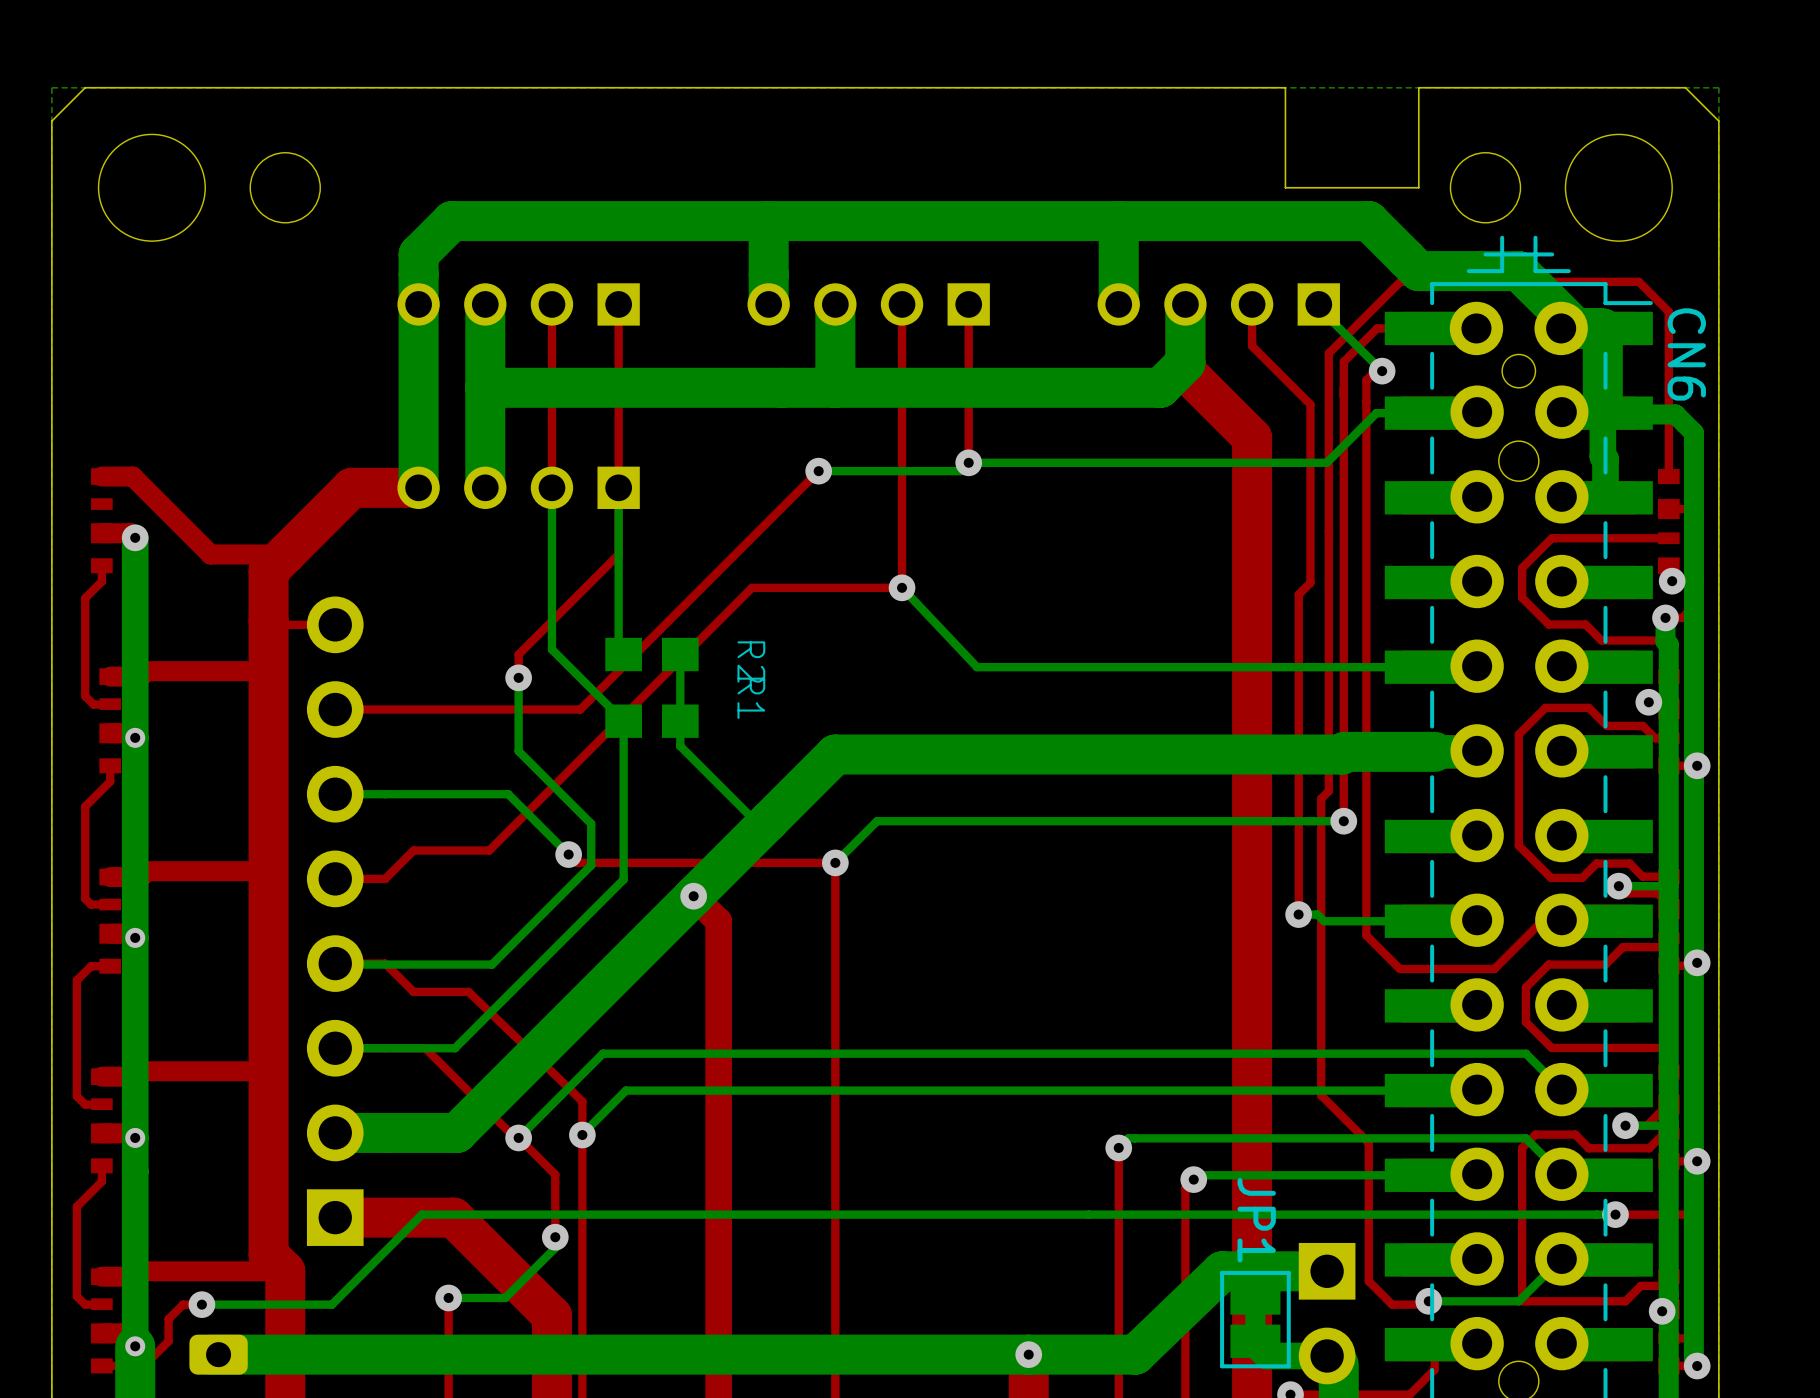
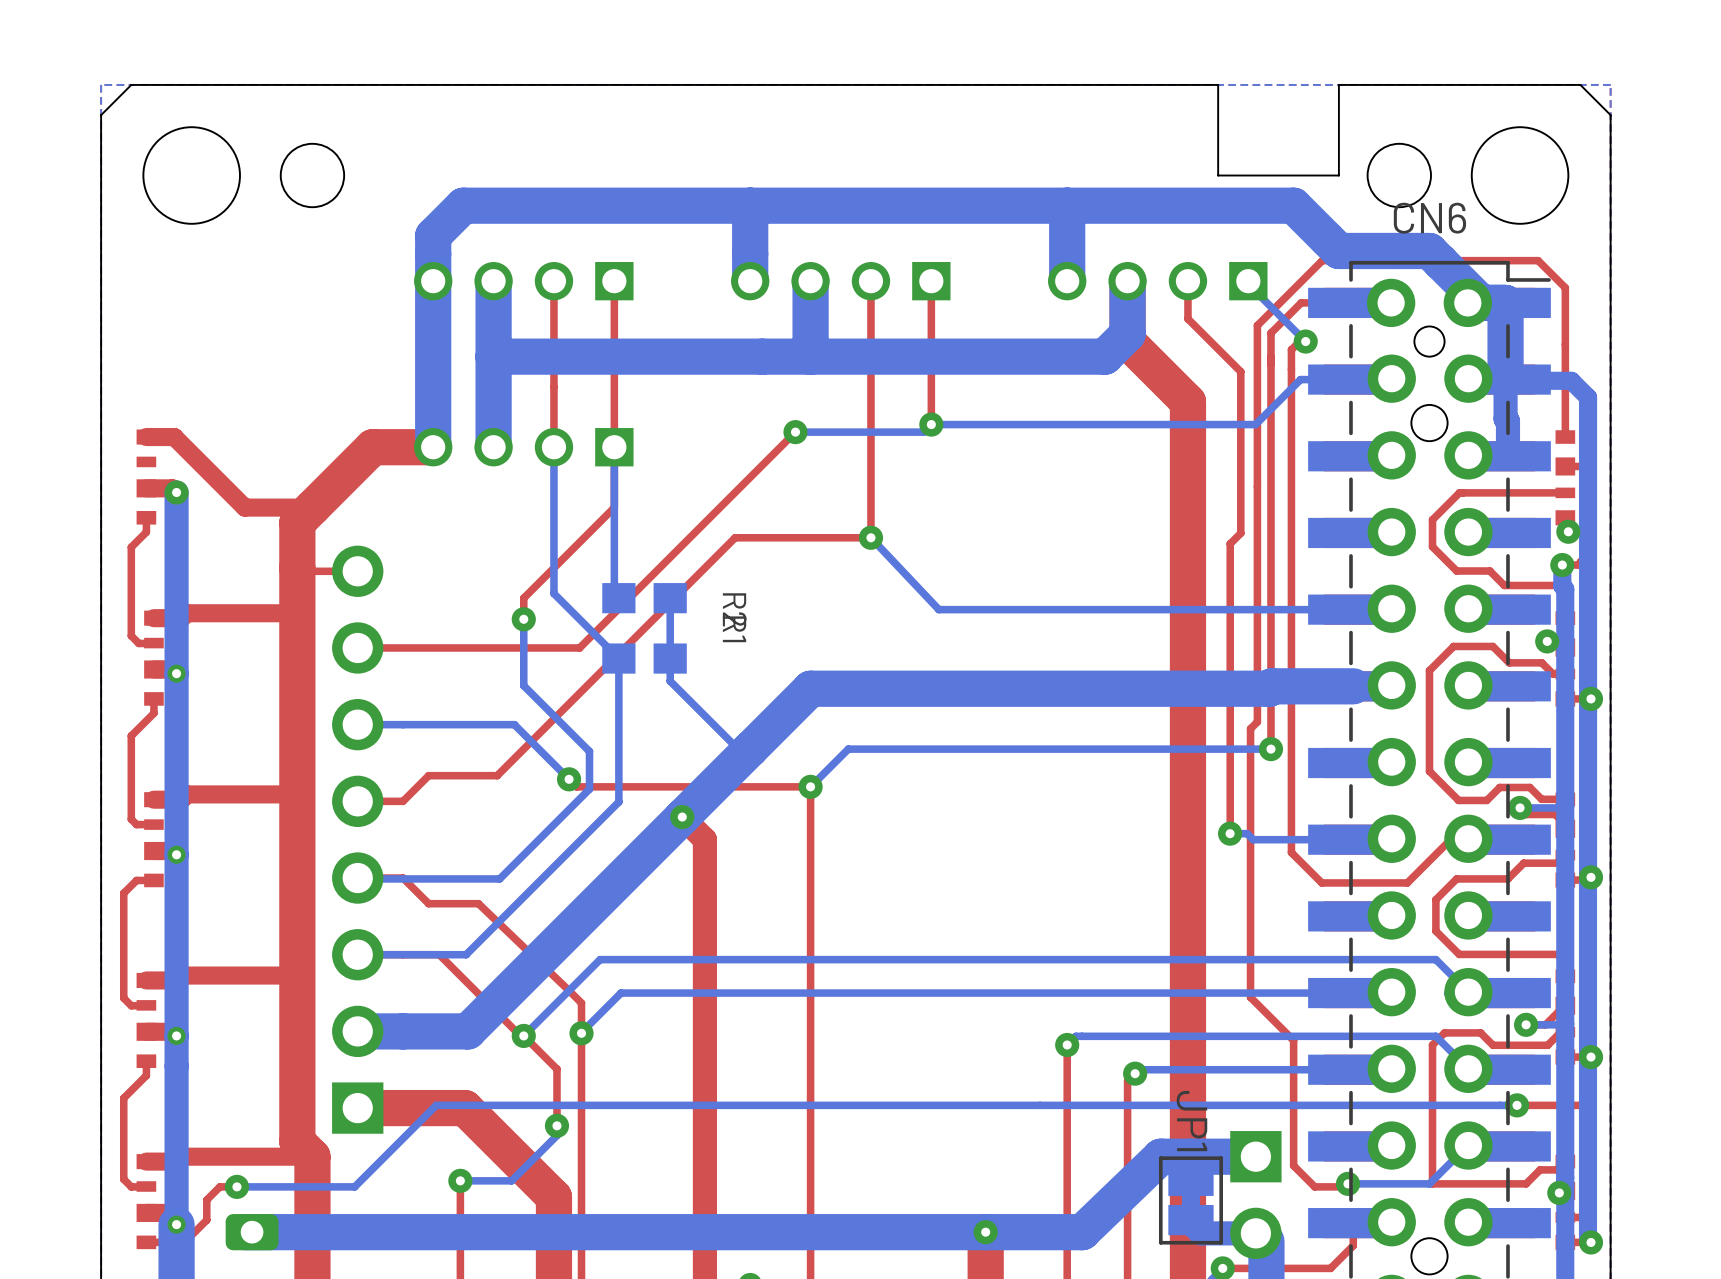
line: (1502, 237) (1502, 271) (1468, 271) -> none
line: (1535, 237) (1535, 271) (1568, 271) -> none
line: (1552, 254) (1485, 254) -> none
CN6 name rotation: 0° (1686, 354) -> 90° counterclockwise (1429, 218)
CN6 name position: CN6 (1686, 354) -> CN6 (1429, 218)

